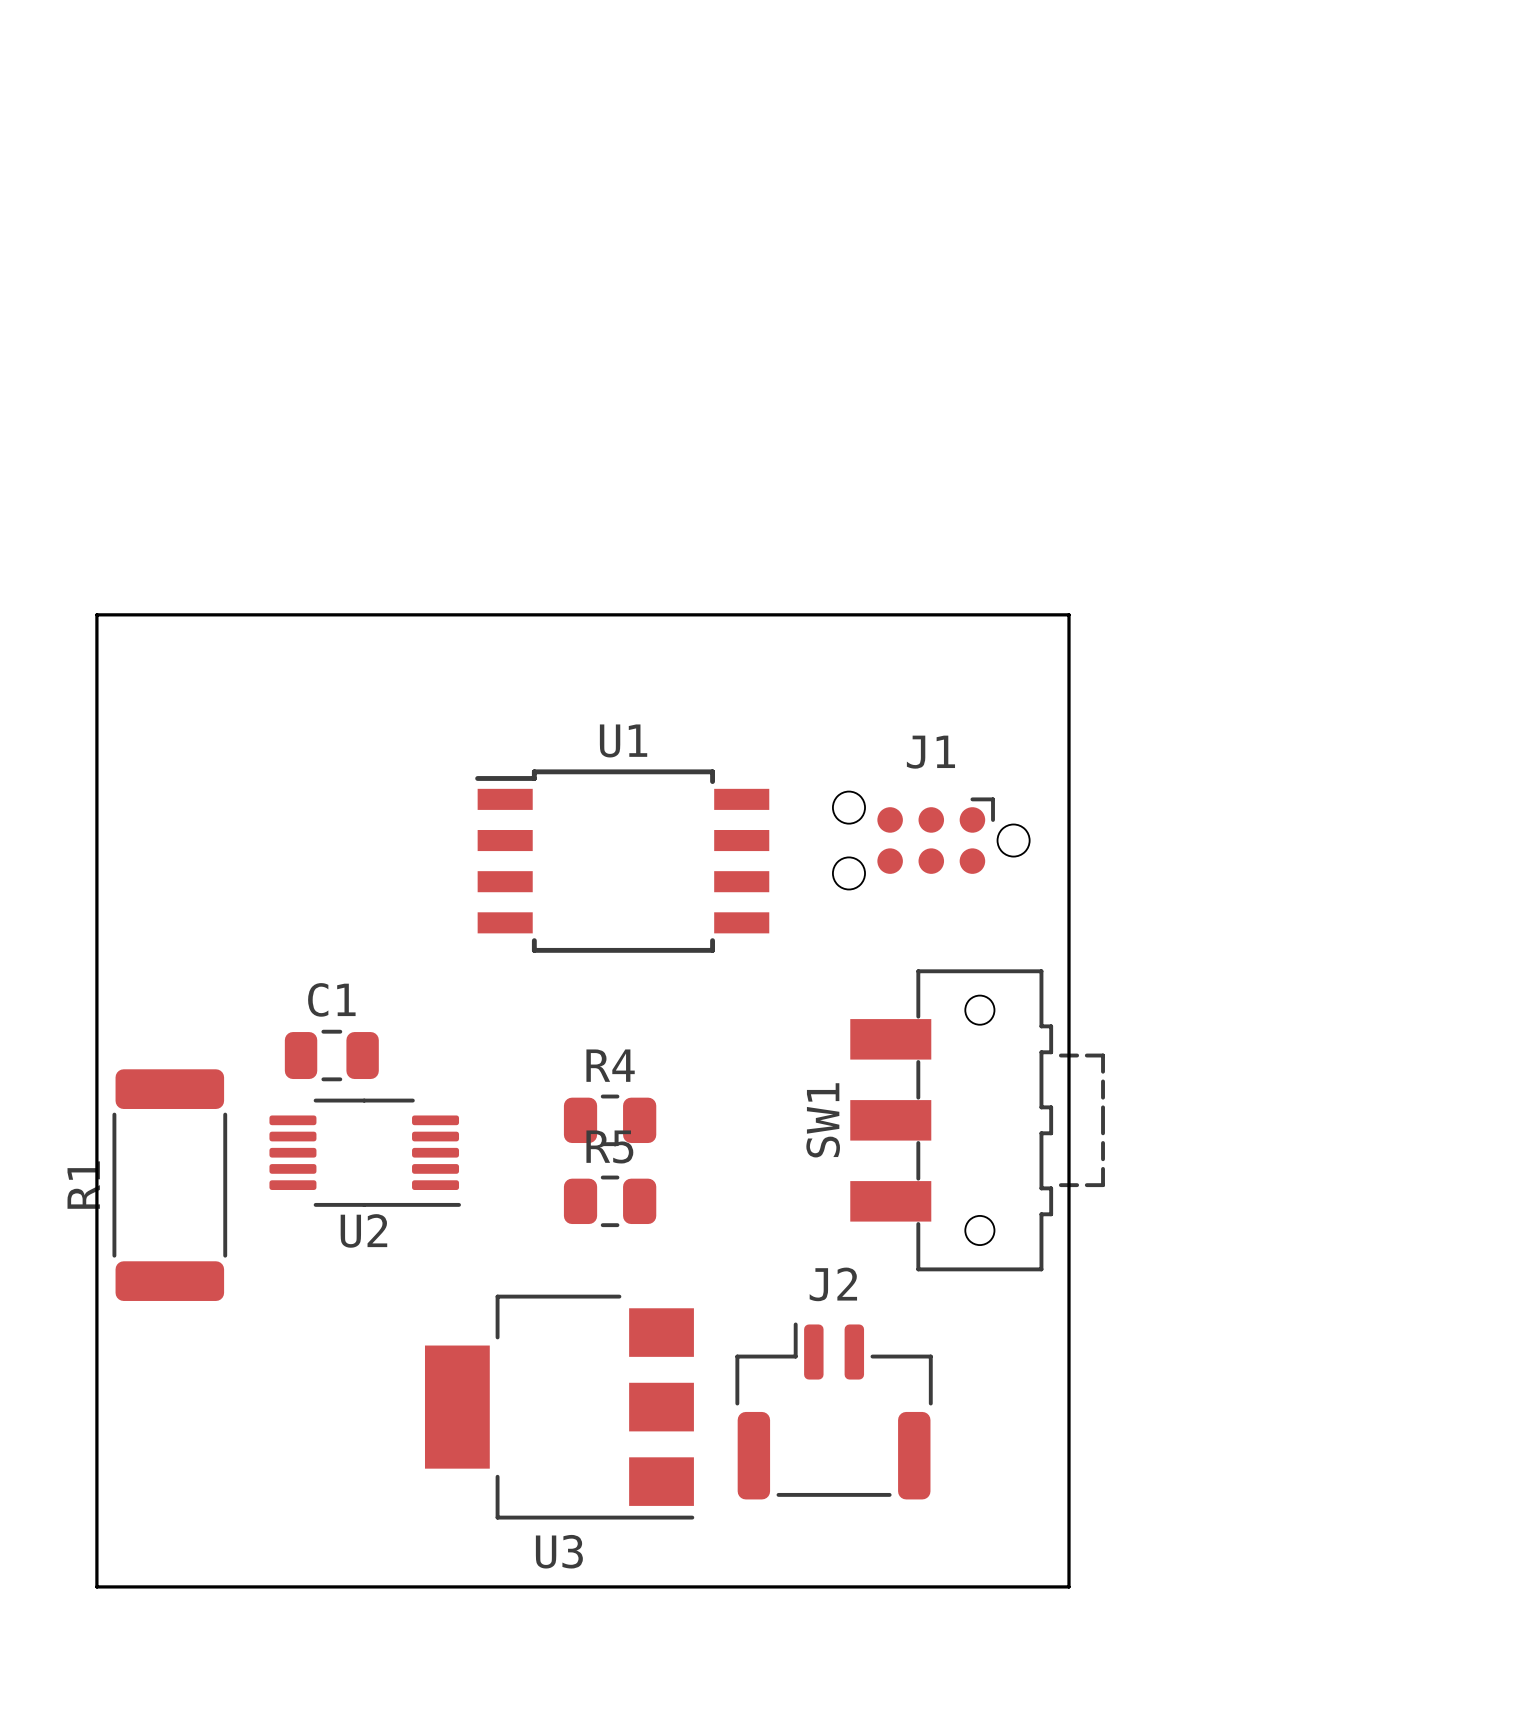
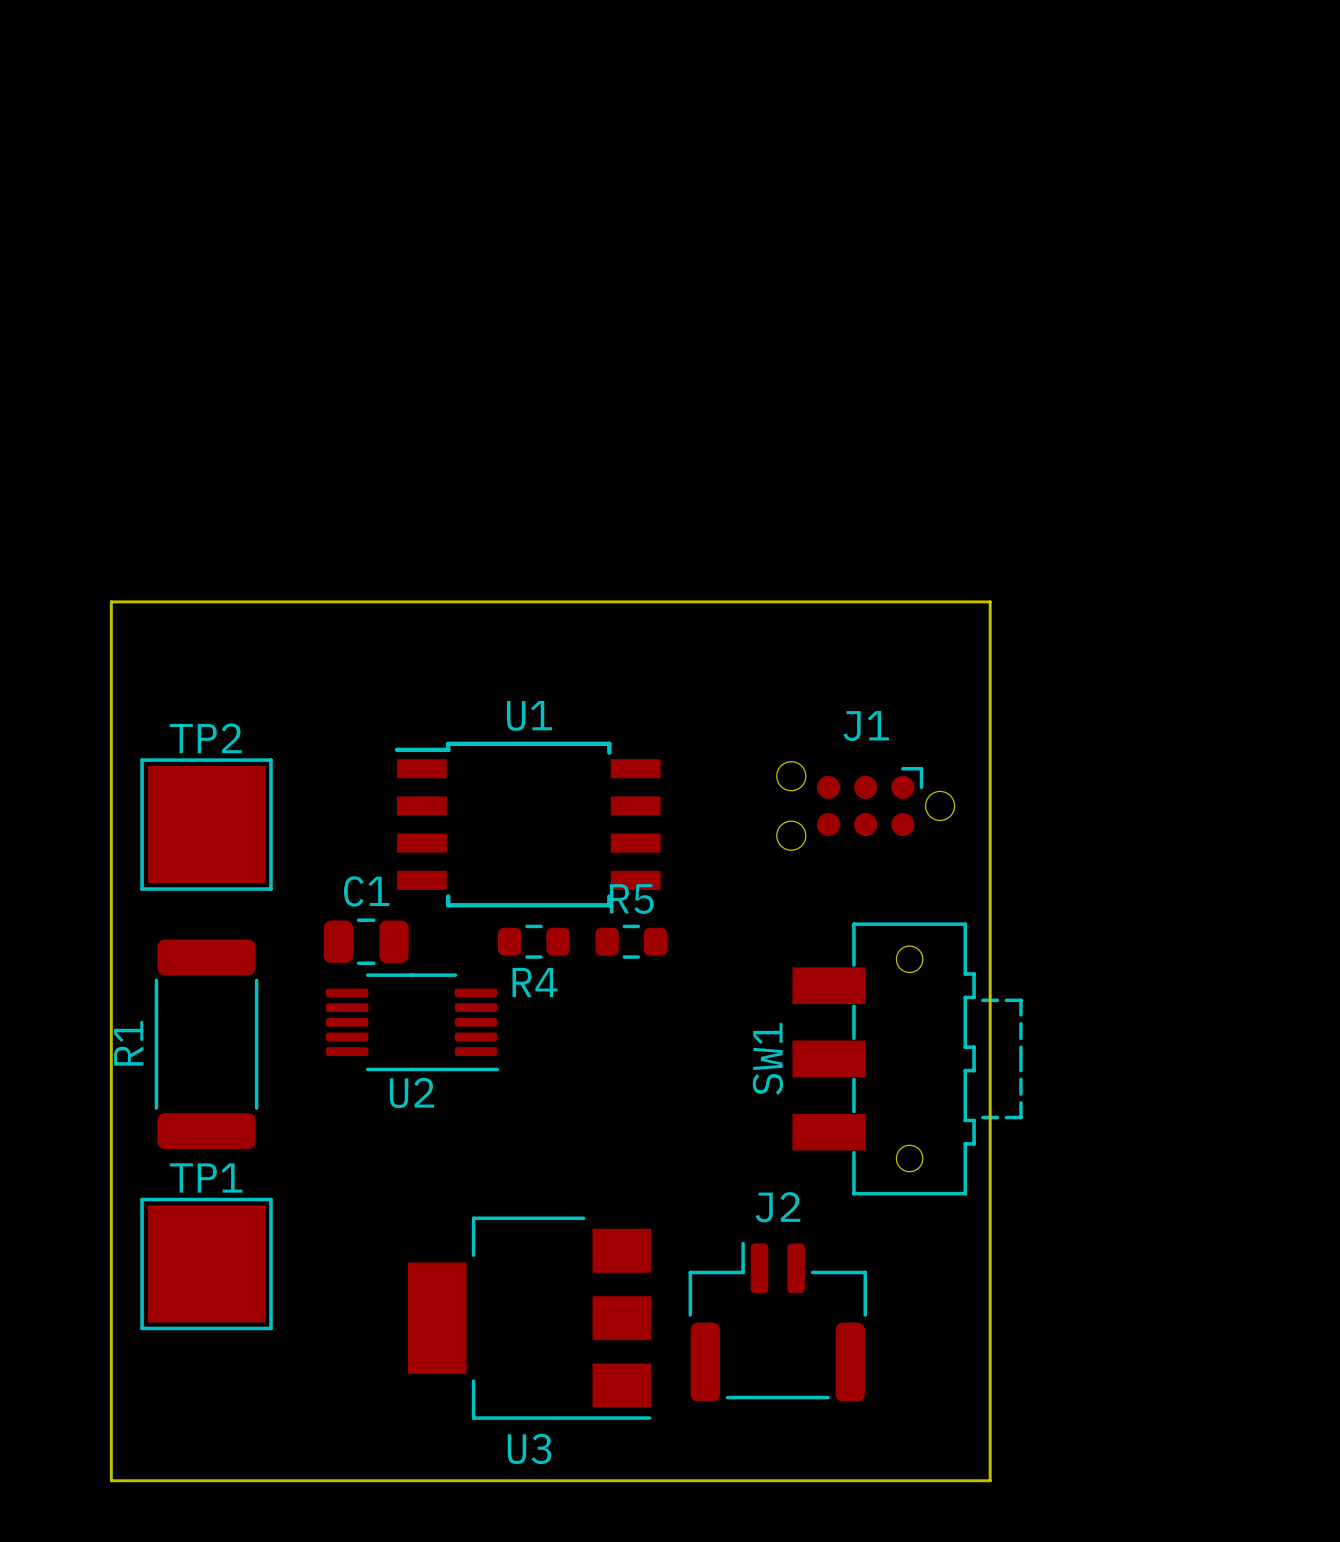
TP2: none -> (206, 824)
U1 position: (622, 861) -> (527, 824)
C1 position: (331, 1055) -> (366, 941)
R4 name position: R4 (610, 1065) -> R4 (535, 982)
R4 footprint: [563, 1094, 657, 1147] -> [498, 924, 570, 959]
U2 position: (365, 1152) -> (412, 1022)
R5 footprint: [563, 1175, 657, 1228] -> [595, 924, 668, 959]
R1 position: (169, 1185) -> (206, 1044)
TP1: none -> (206, 1263)

